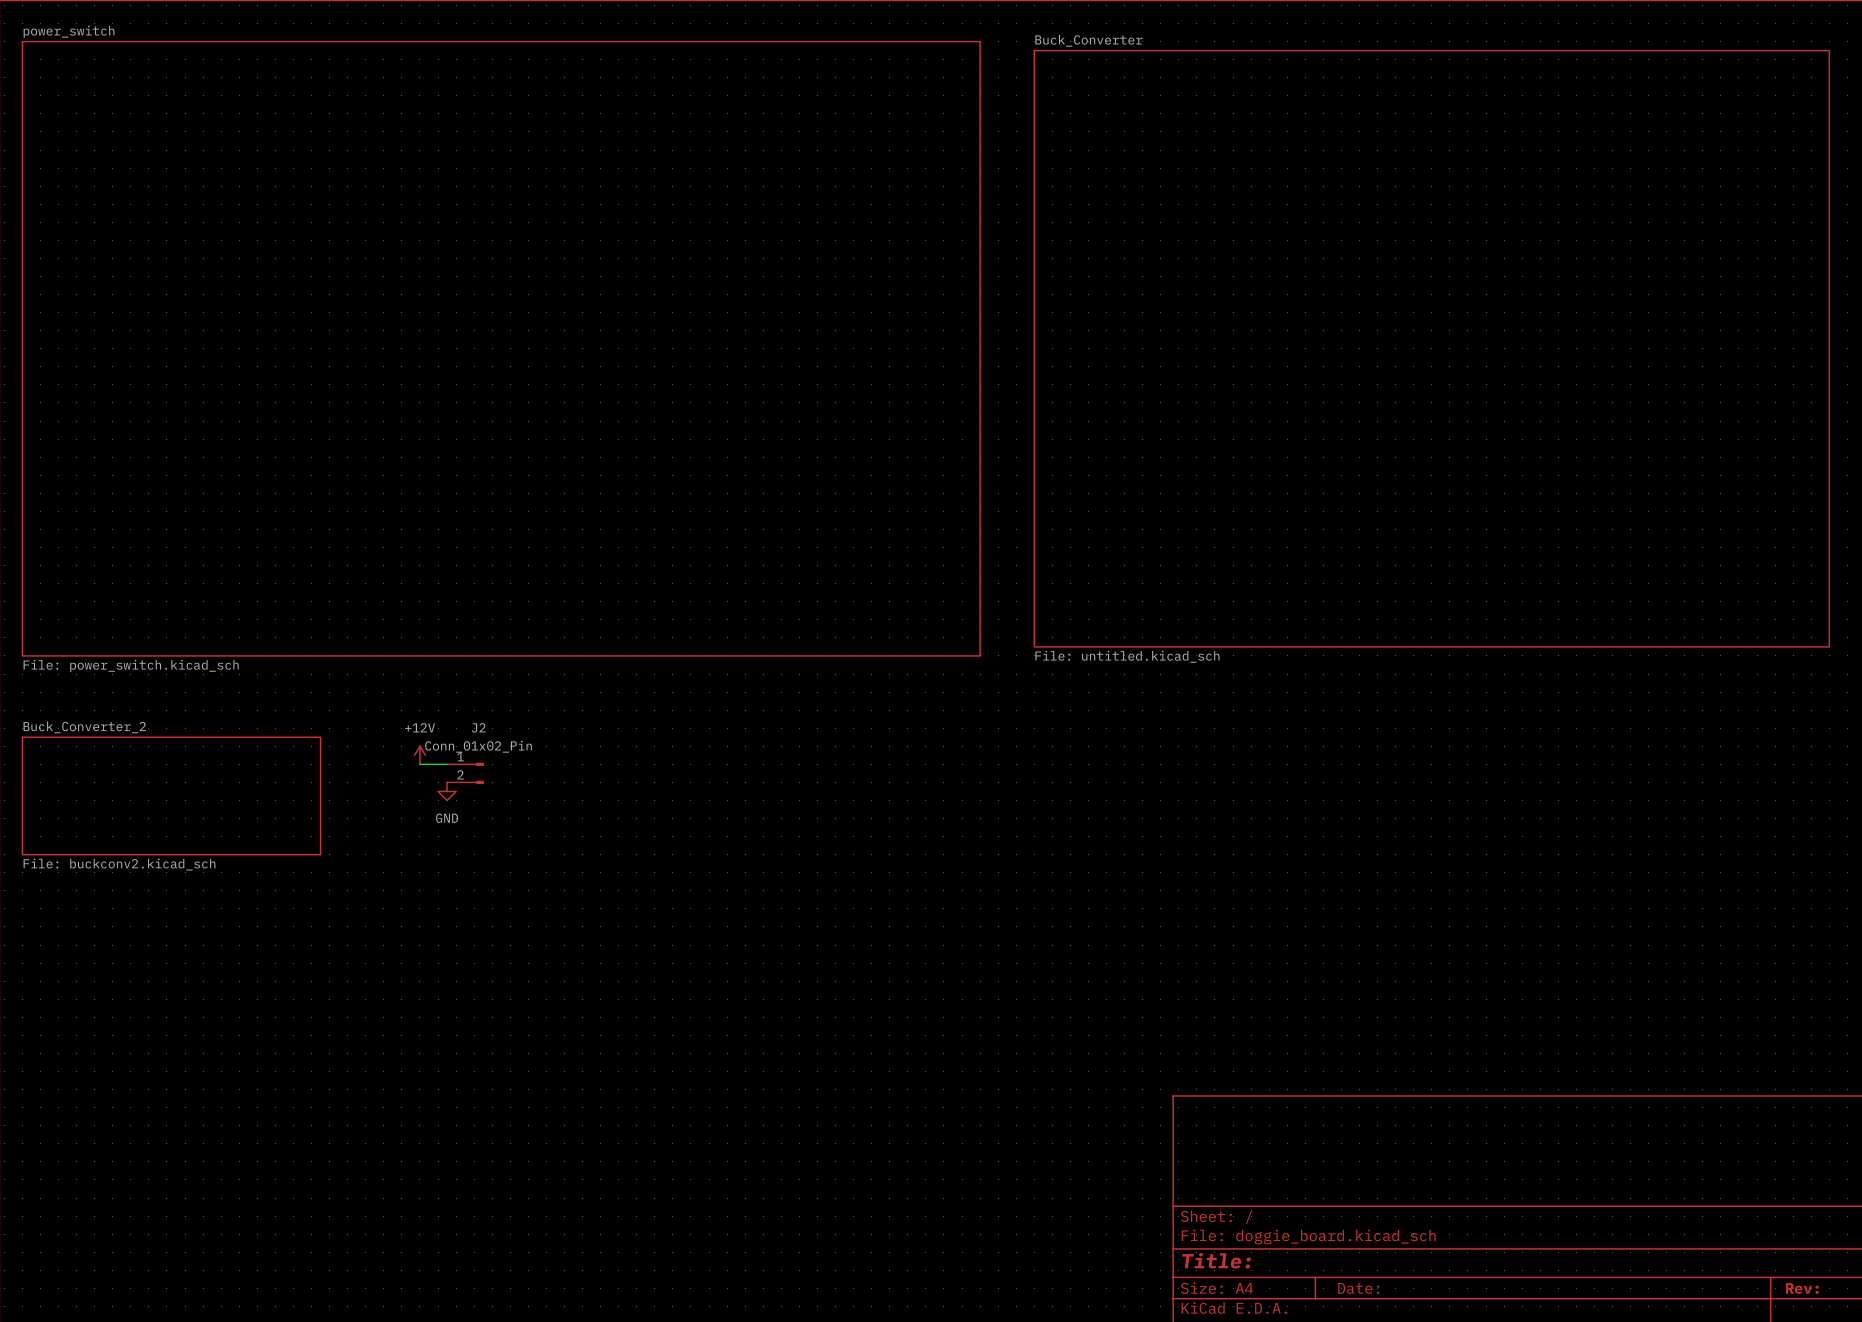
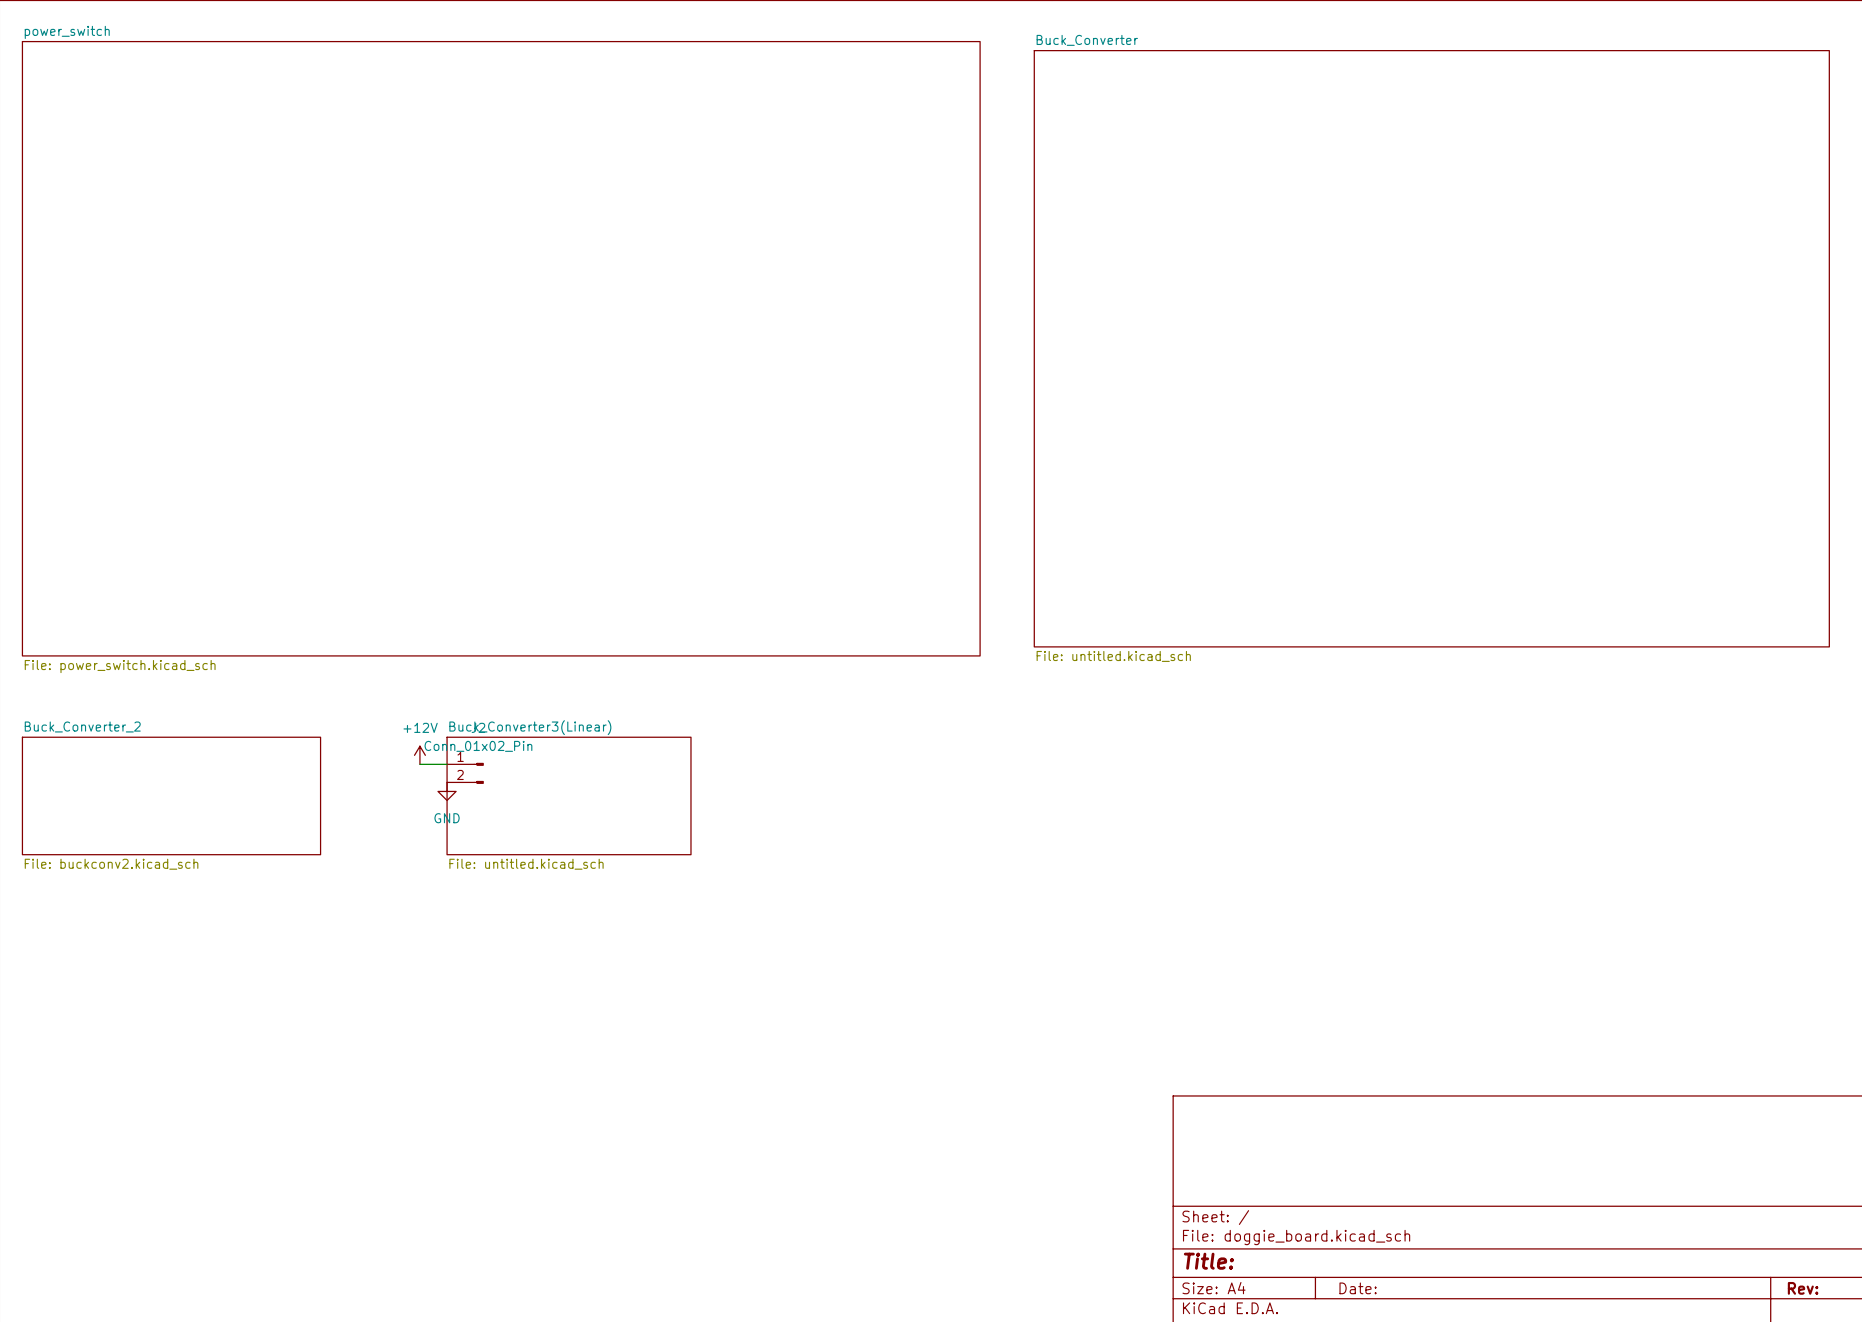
sheet Buck_Converter3(Linear): none -> File: untitled.kicad_sch (569, 795)

